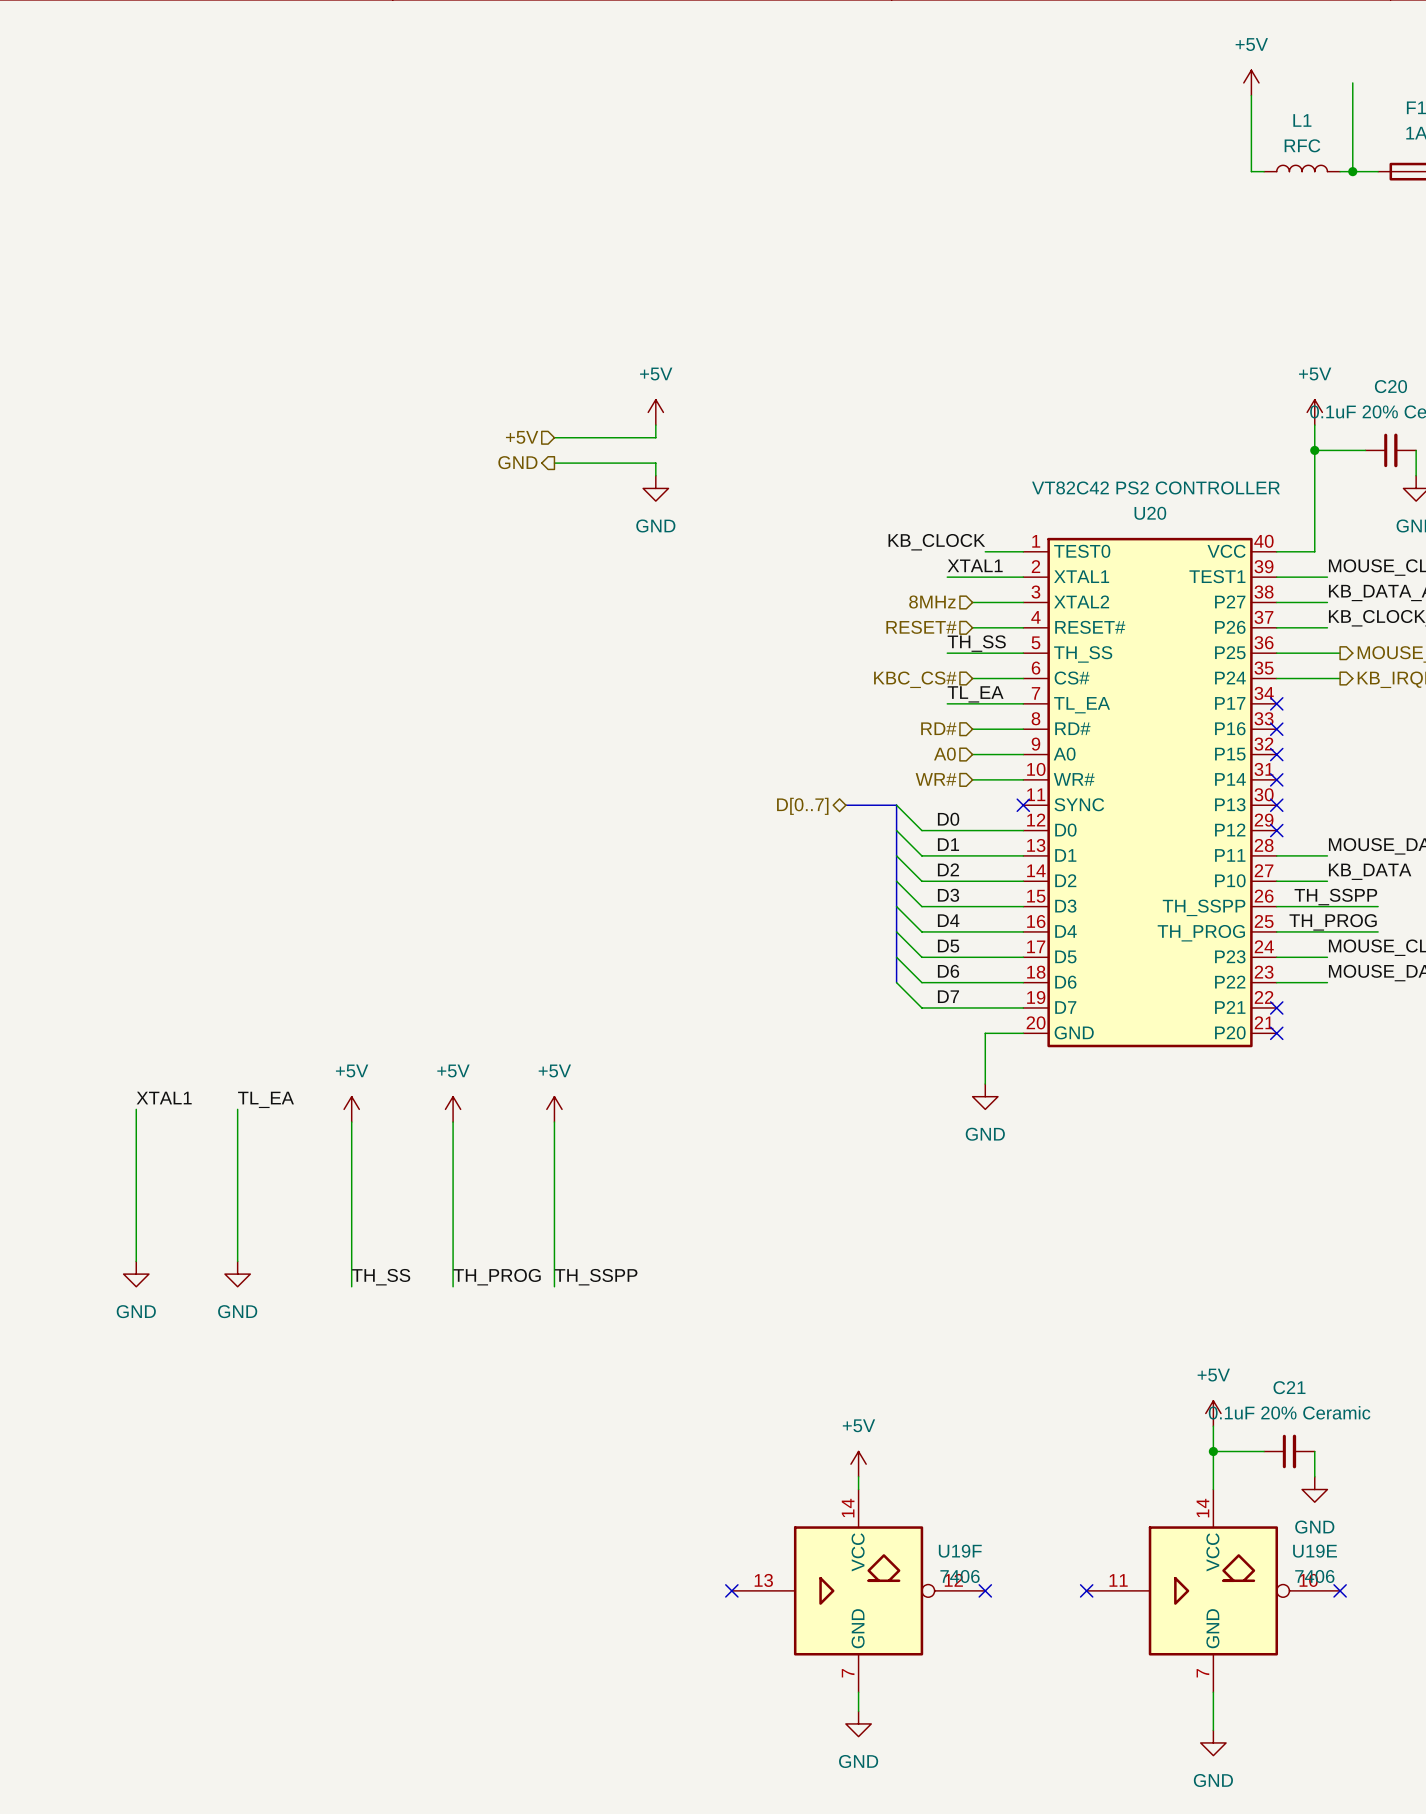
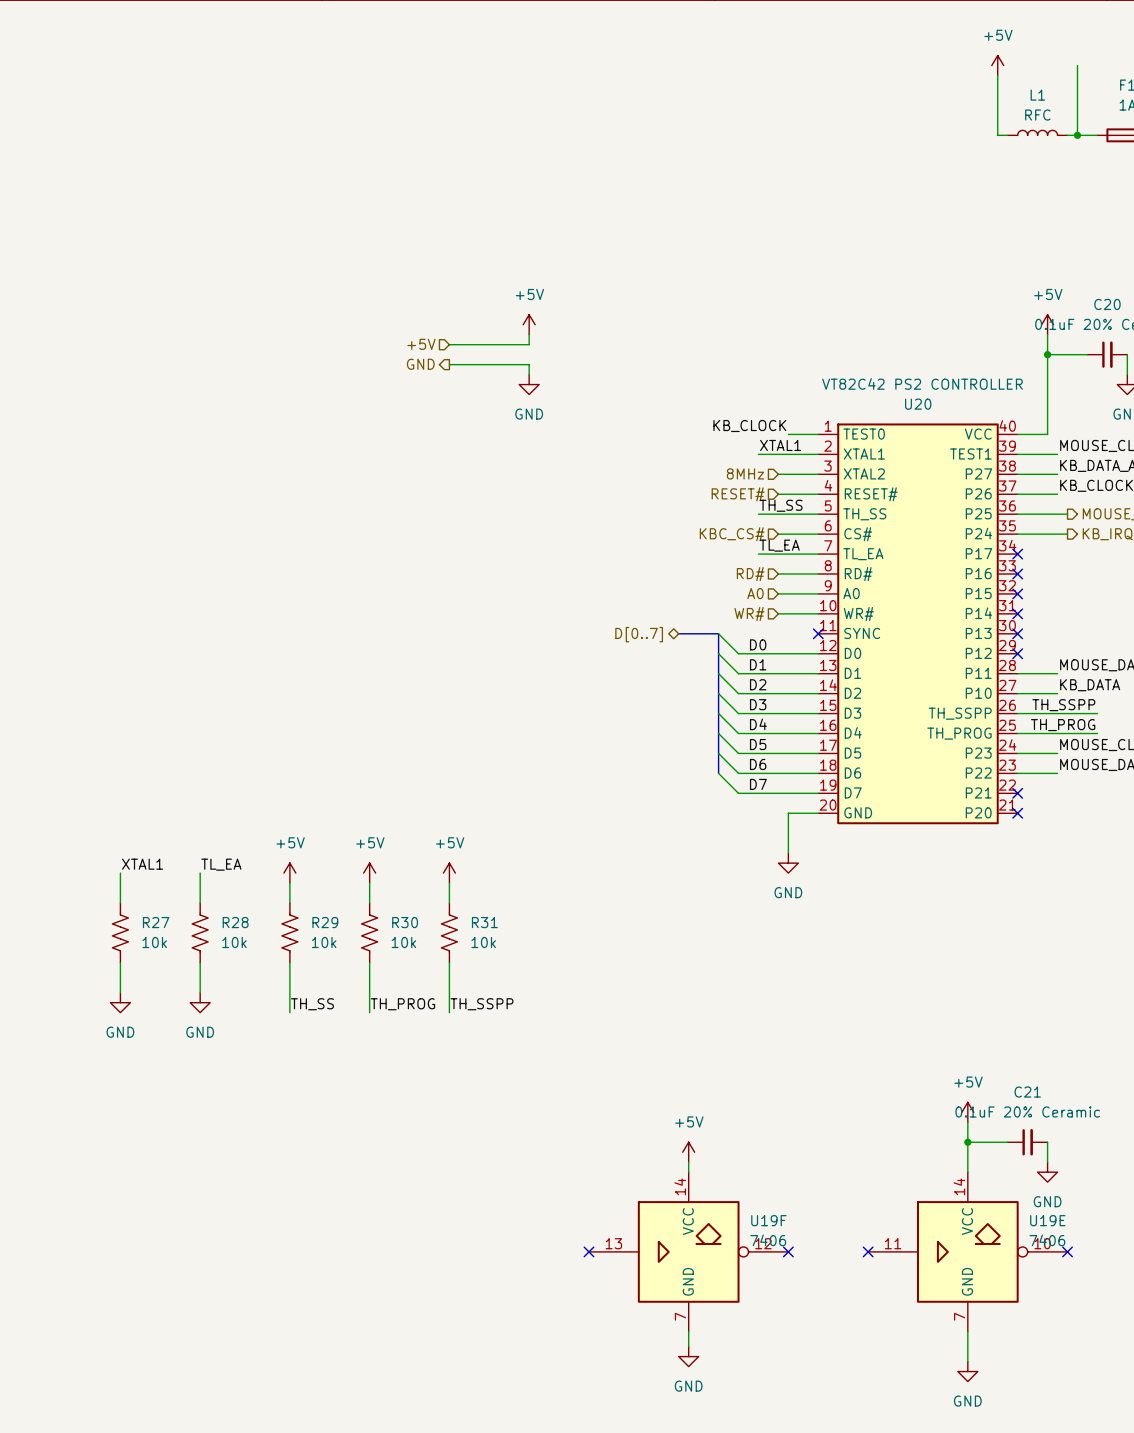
R27: none -> 10k (120, 932)
R28: none -> 10k (200, 932)
R29: none -> 10k (289, 932)
R30: none -> 10k (369, 932)
R31: none -> 10k (449, 932)

